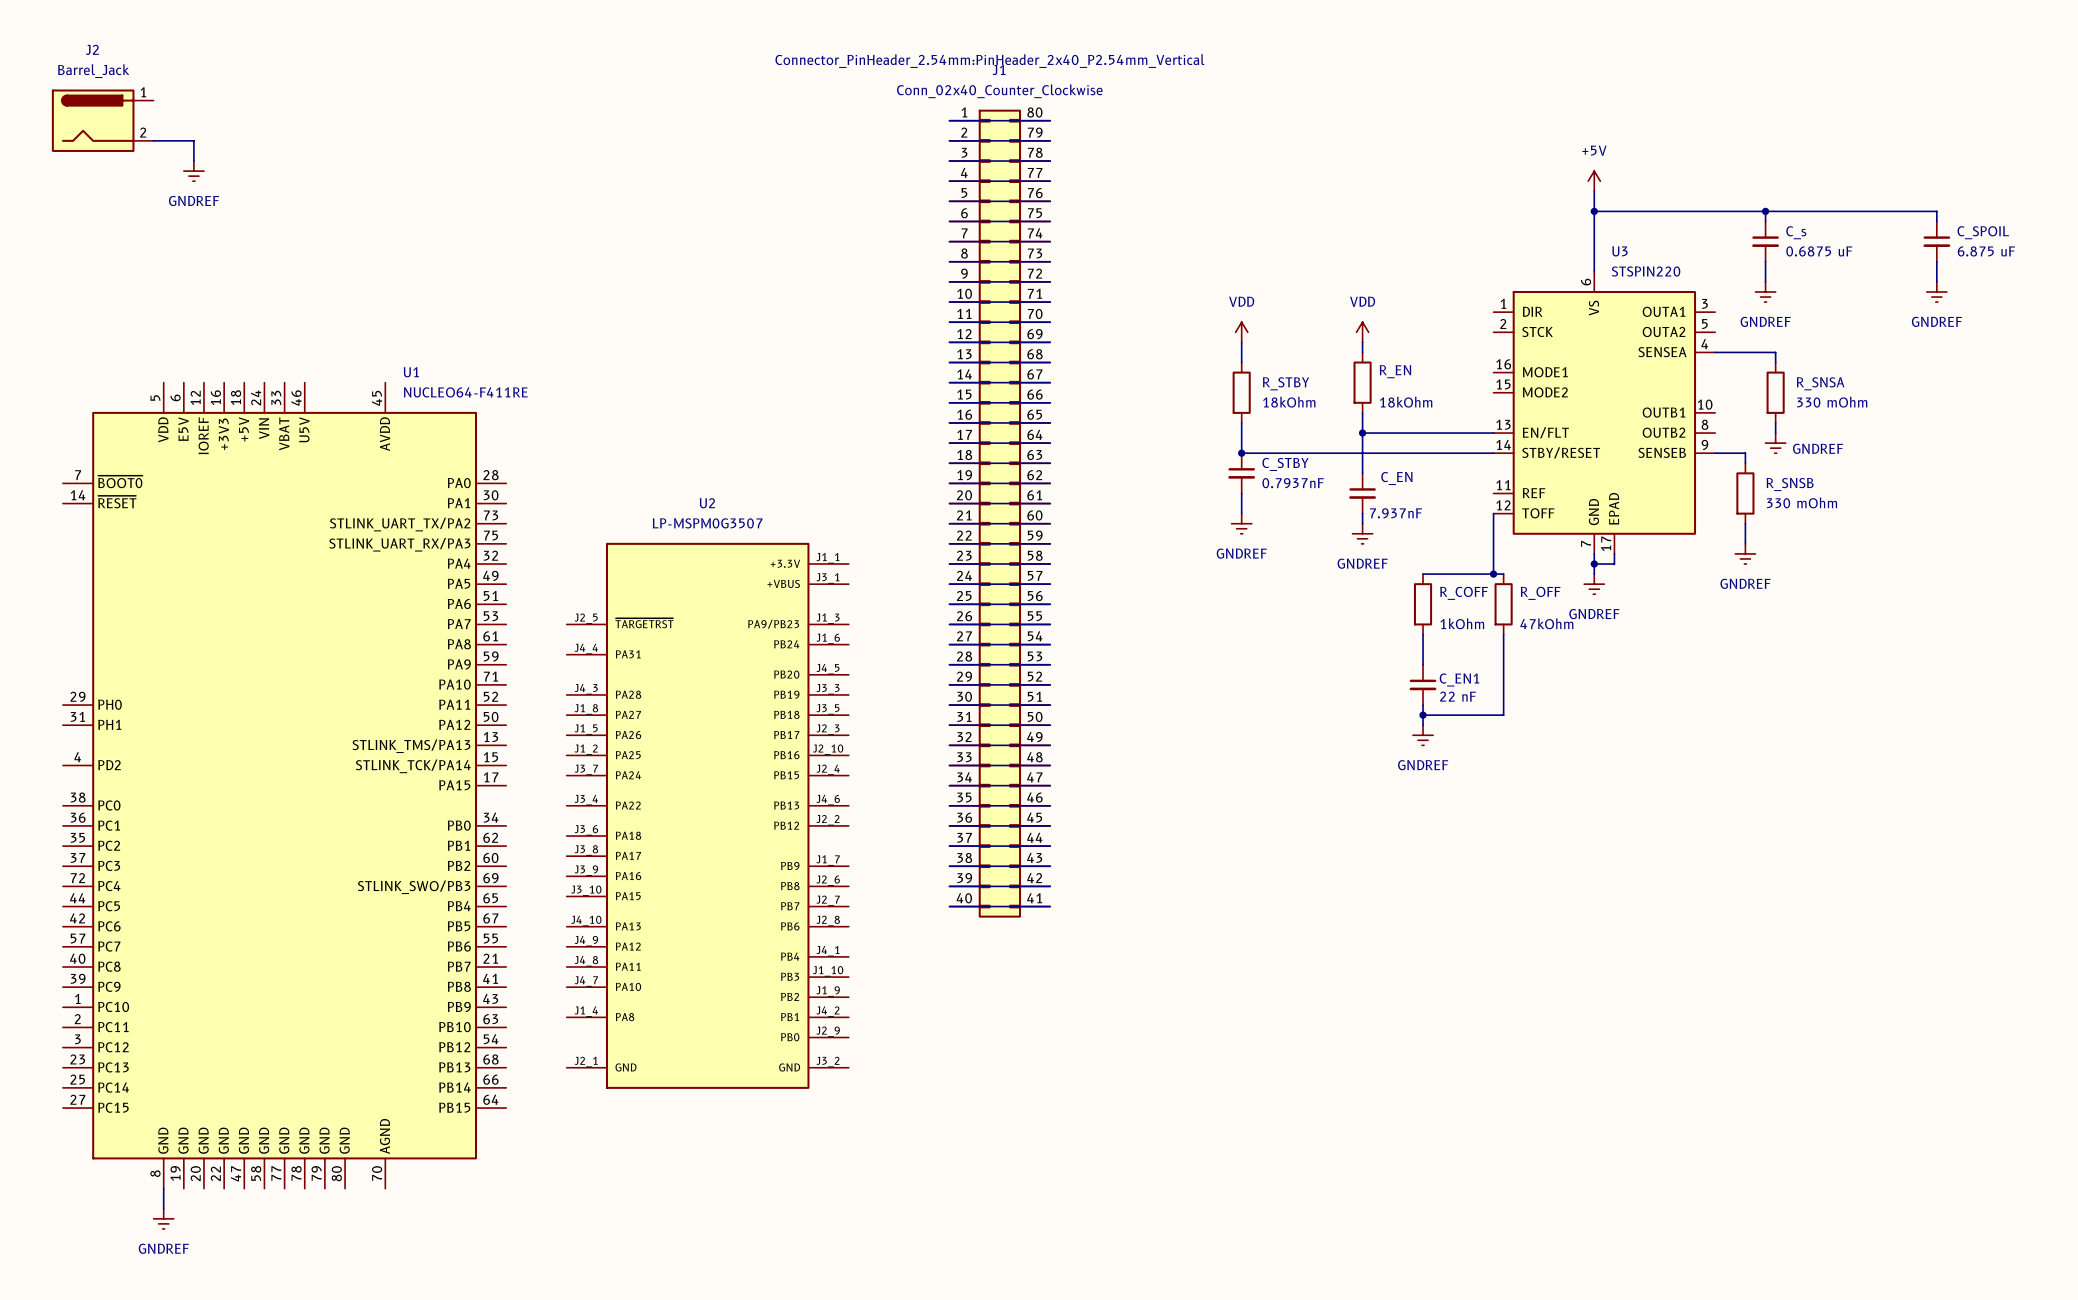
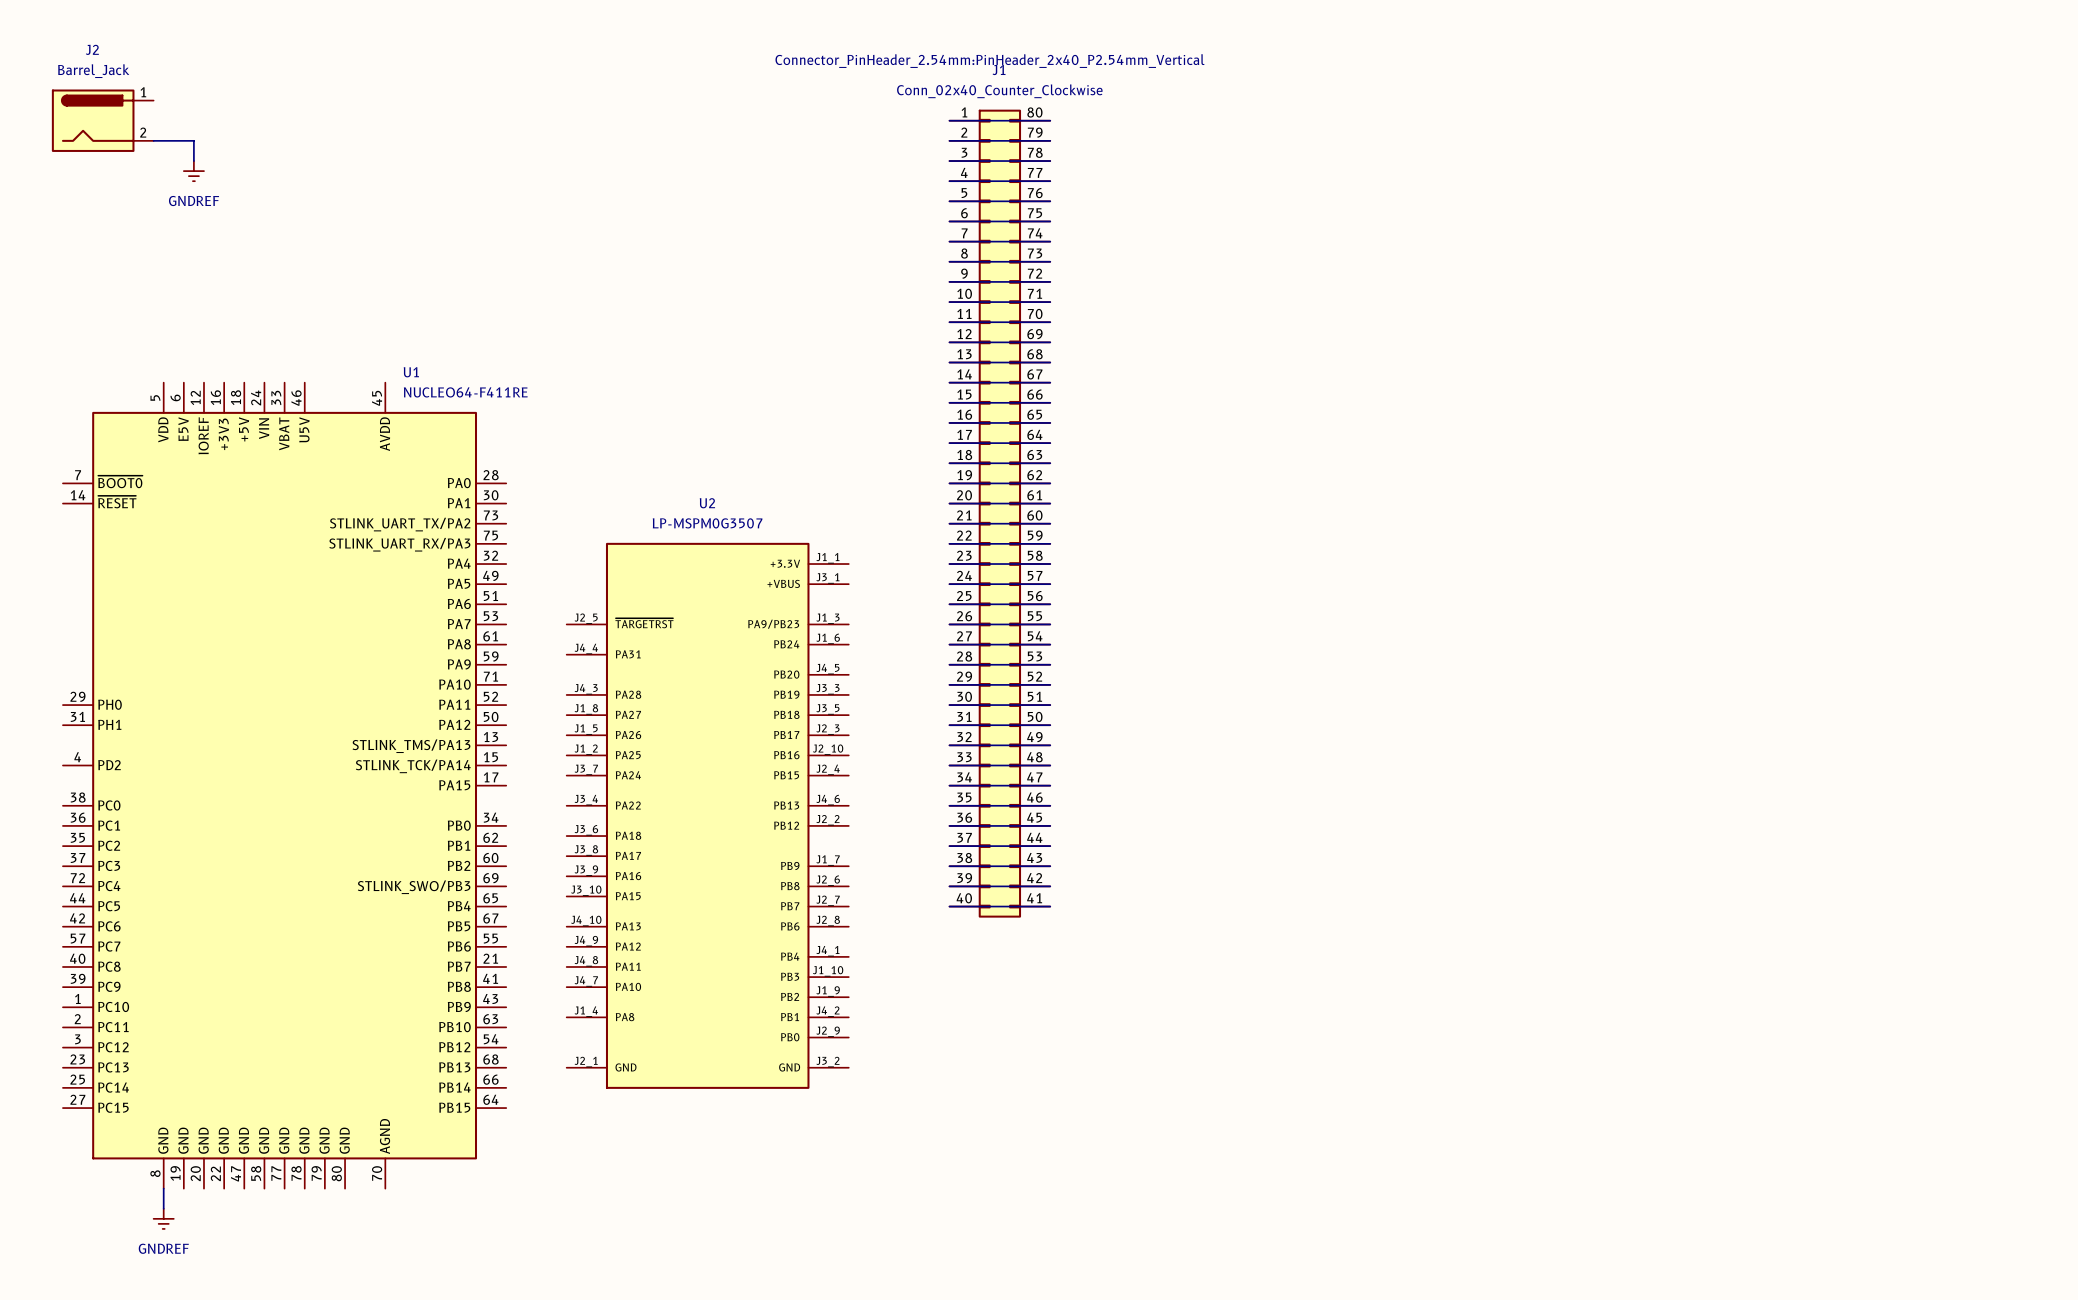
power symbol: +5V (1594, 181) -> none
wire: (1594, 191) (1594, 271) -> none
wire: (1594, 211) (1936, 211) (1936, 221) -> none
junction: (1594, 211) -> none
wire: (1765, 211) (1765, 221) -> none
junction: (1765, 211) -> none
C_s: 0.6875 uF (1765, 241) -> none
C_SPOIL: 6.875 uF (1936, 241) -> none
wire: (1765, 261) (1765, 281) -> none
wire: (1936, 261) (1936, 281) -> none
power symbol: GNDREF (1765, 291) -> none
power symbol: GNDREF (1936, 291) -> none
power symbol: VDD (1241, 332) -> none
power symbol: VDD (1362, 332) -> none
wire: (1241, 342) (1241, 362) -> none
wire: (1362, 342) (1362, 352) -> none
wire: (1715, 352) (1775, 352) (1775, 362) -> none
R_EN: 18kOhm (1362, 382) -> none
R_STBY: 18kOhm (1241, 392) -> none
R_SNSA: 330 mOhm (1775, 392) -> none
wire: (1362, 412) (1362, 473) -> none
U3: STSPIN220 (1604, 412) -> none
wire: (1241, 422) (1241, 453) (1493, 453) -> none
wire: (1775, 422) (1775, 433) -> none
wire: (1362, 433) (1493, 433) -> none
junction: (1362, 433) -> none
power symbol: GNDREF (1775, 443) -> none
junction: (1241, 453) -> none
wire: (1715, 453) (1745, 453) (1745, 463) -> none
C_STBY: 0.7937nF (1241, 473) -> none
wire: (1241, 493) (1241, 513) -> none
C_EN: 7.937nF (1362, 493) -> none
R_SNSB: 330 mOhm (1745, 493) -> none
wire: (1362, 513) (1362, 523) -> none
wire: (1493, 513) (1493, 574) -> none
power symbol: GNDREF (1241, 523) -> none
wire: (1745, 523) (1745, 543) -> none
power symbol: GNDREF (1362, 533) -> none
wire: (1594, 553) (1594, 574) -> none
wire: (1614, 553) (1614, 564) (1594, 564) -> none
power symbol: GNDREF (1745, 553) -> none
junction: (1594, 564) -> none
wire: (1423, 574) (1503, 574) -> none
junction: (1493, 574) -> none
power symbol: GNDREF (1594, 584) -> none
R_COFF: 1kOhm (1423, 604) -> none
R_OFF: 47kOhm (1503, 604) -> none
wire: (1423, 634) (1423, 664) -> none
wire: (1503, 634) (1503, 715) (1423, 715) -> none
C_EN1: 22 nF (1423, 684) -> none
wire: (1423, 705) (1423, 725) -> none
junction: (1423, 715) -> none
power symbol: GNDREF (1423, 735) -> none

